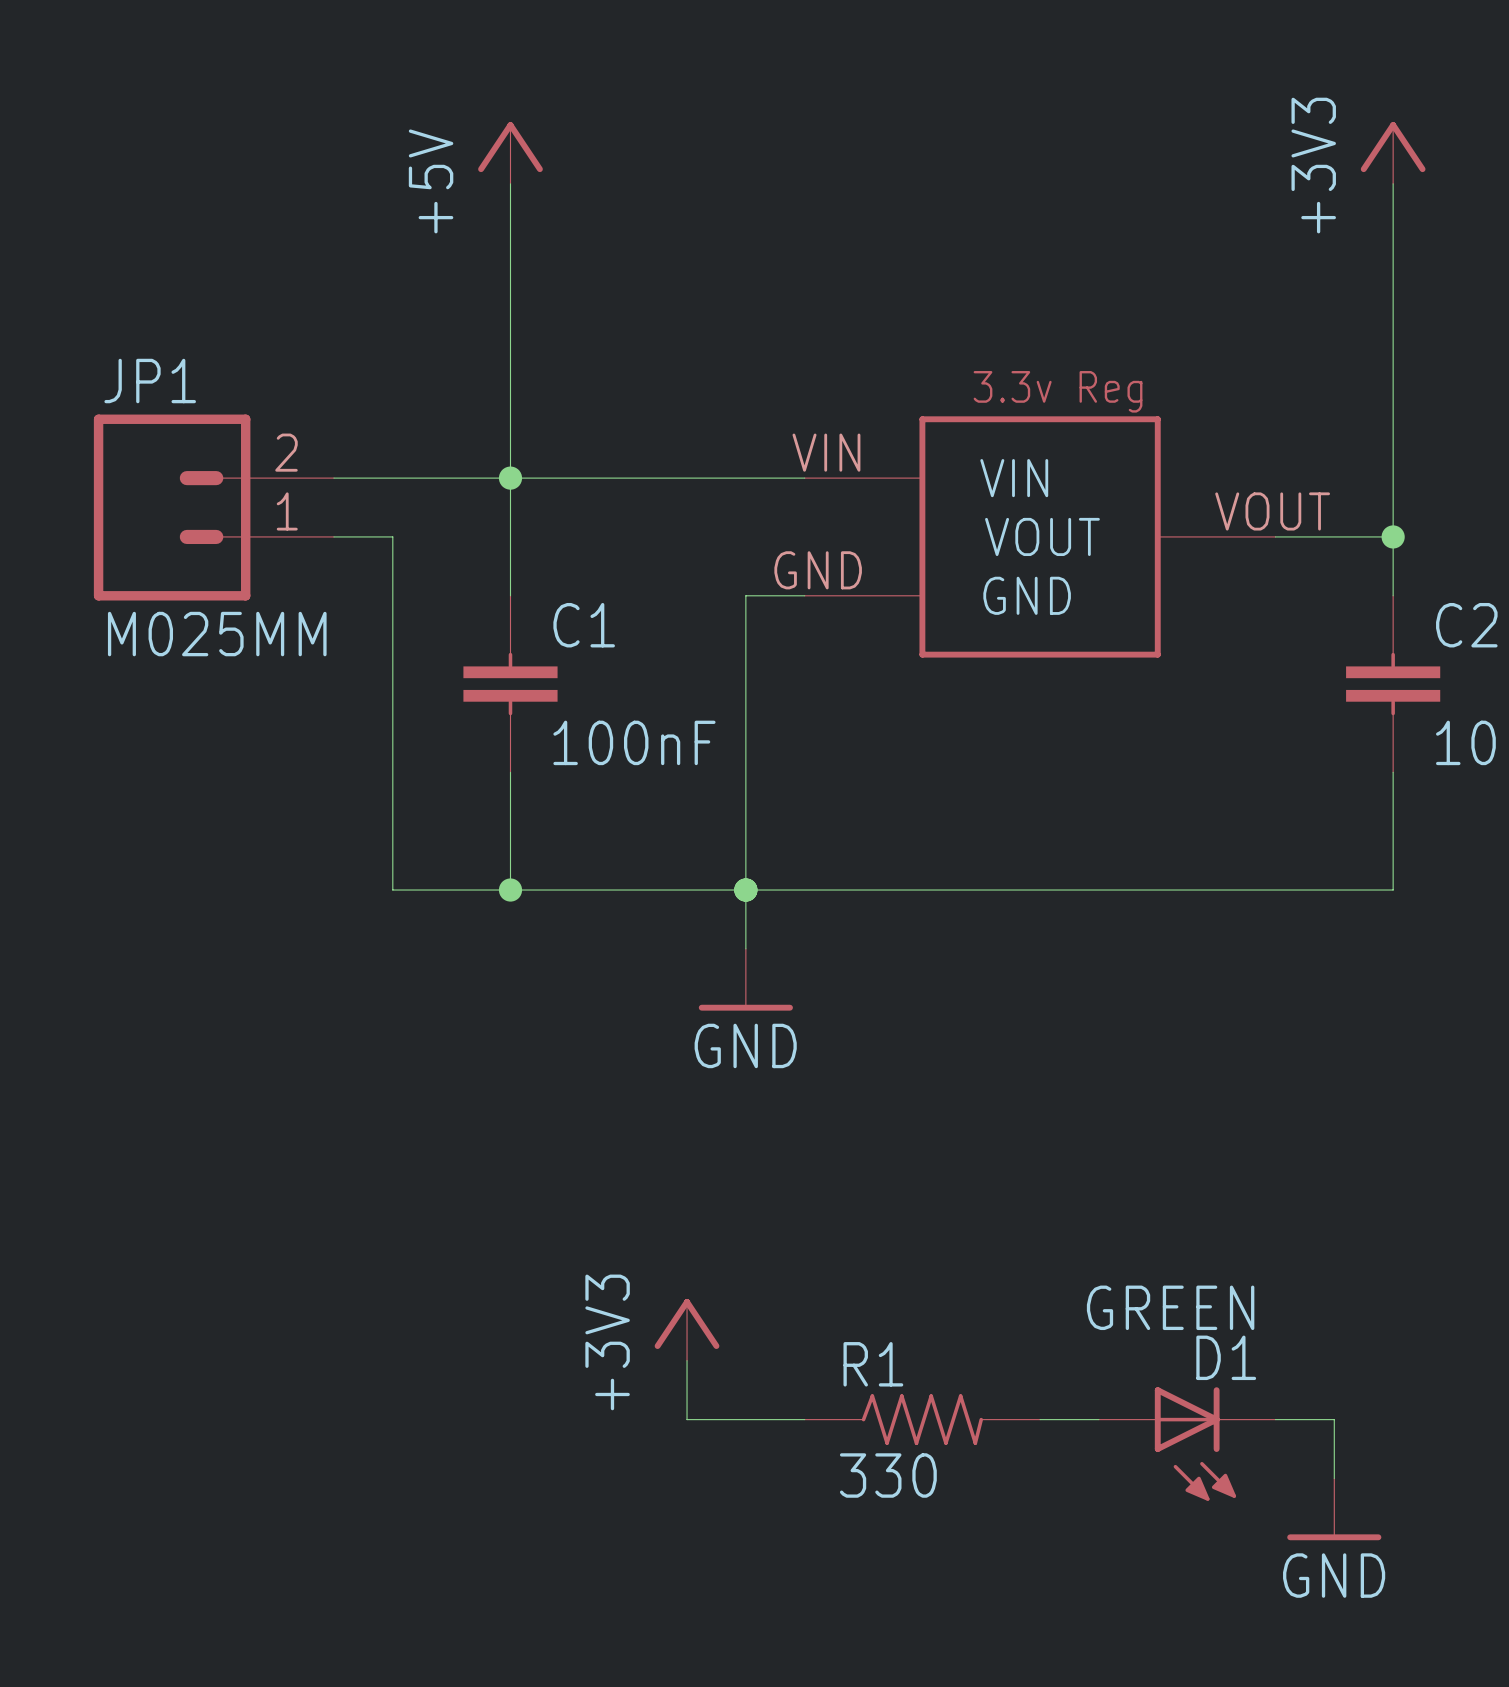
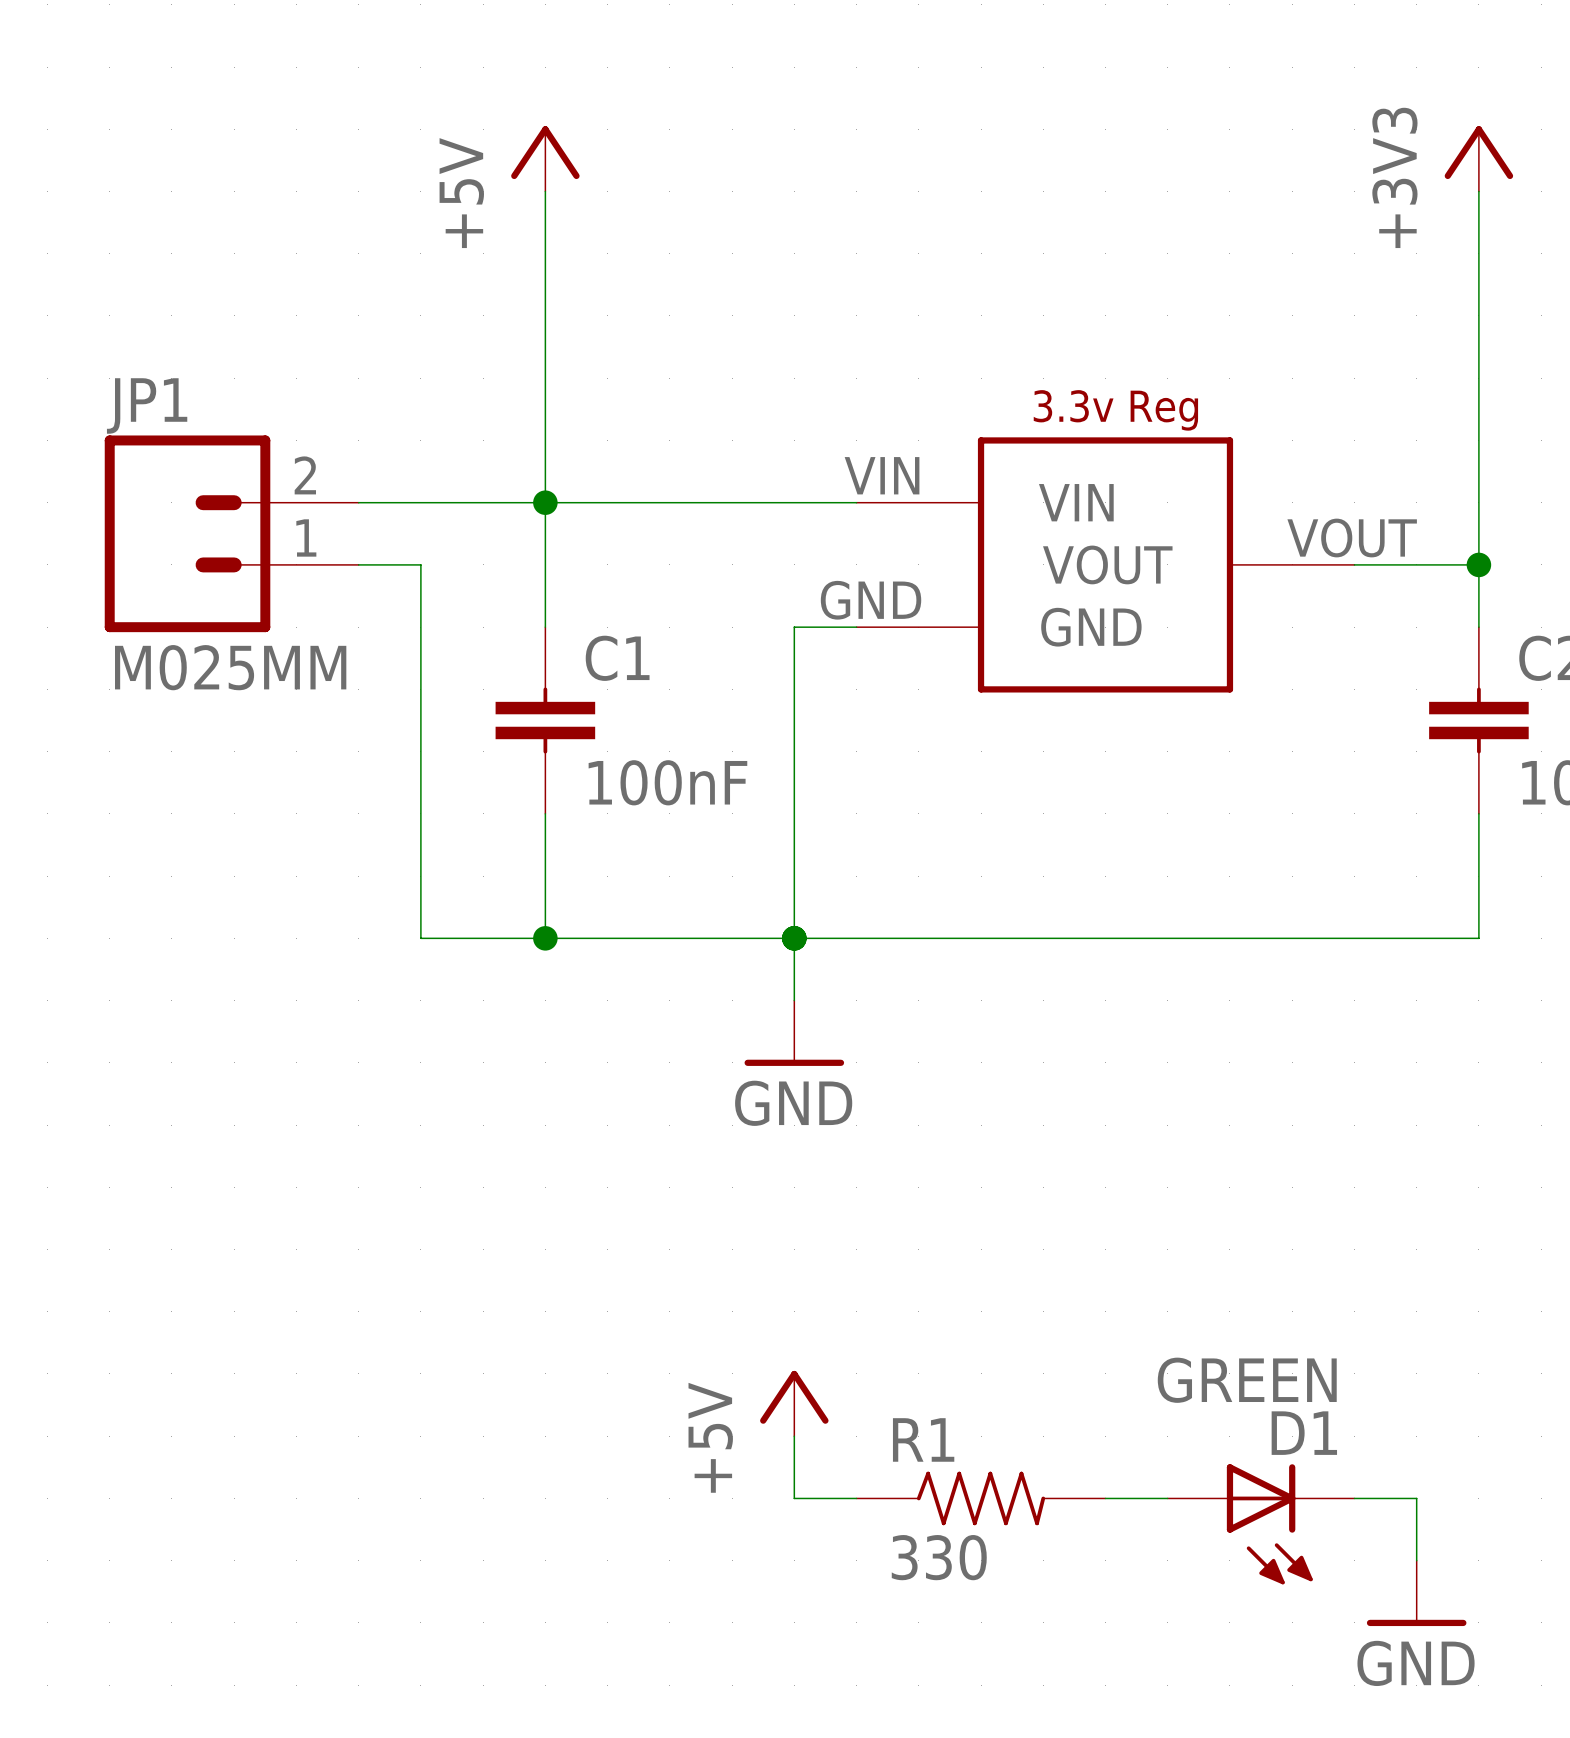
power symbol: +3V3 (687, 1329) -> none
power symbol: none -> +5V (794, 1403)
wire: (687, 1360) (687, 1419) (745, 1419) -> (794, 1436) (794, 1498)

